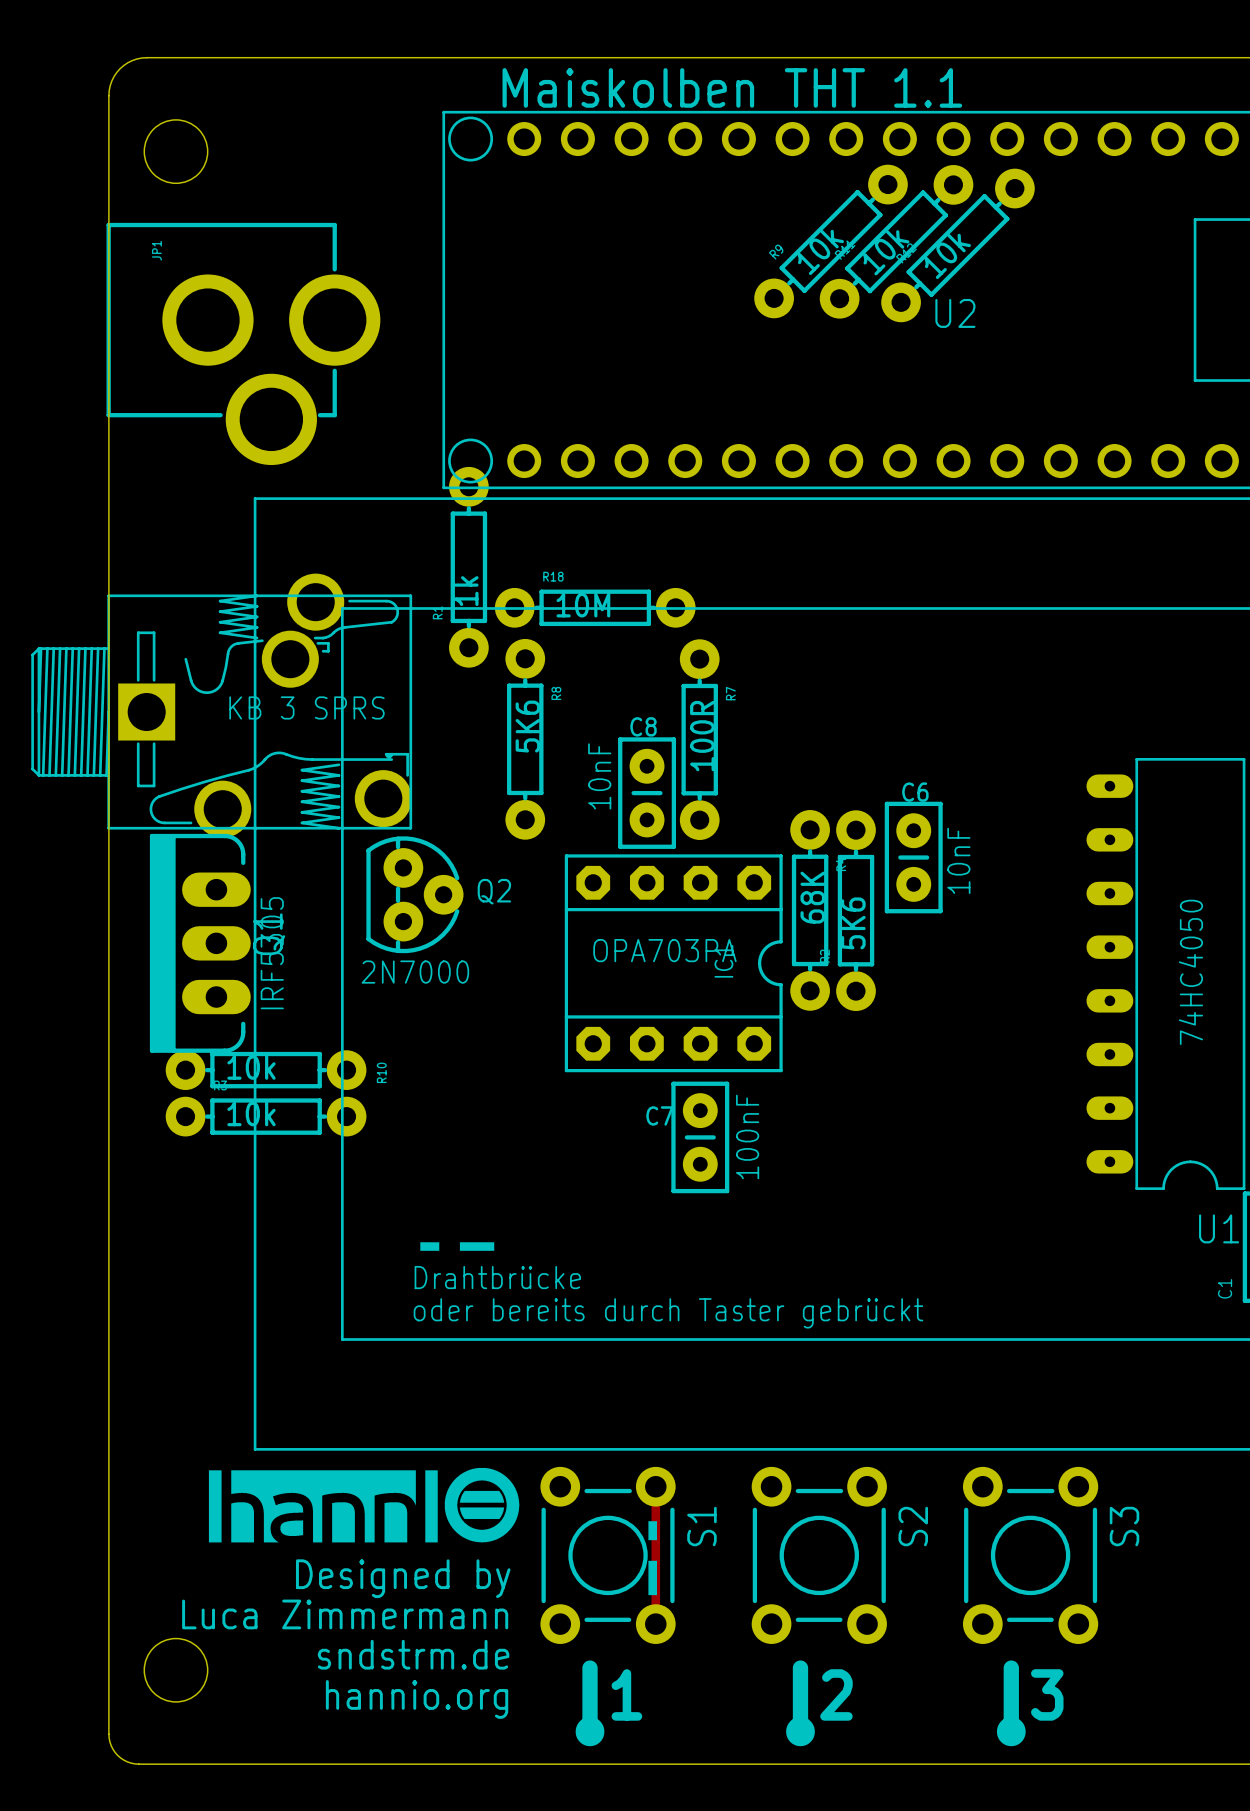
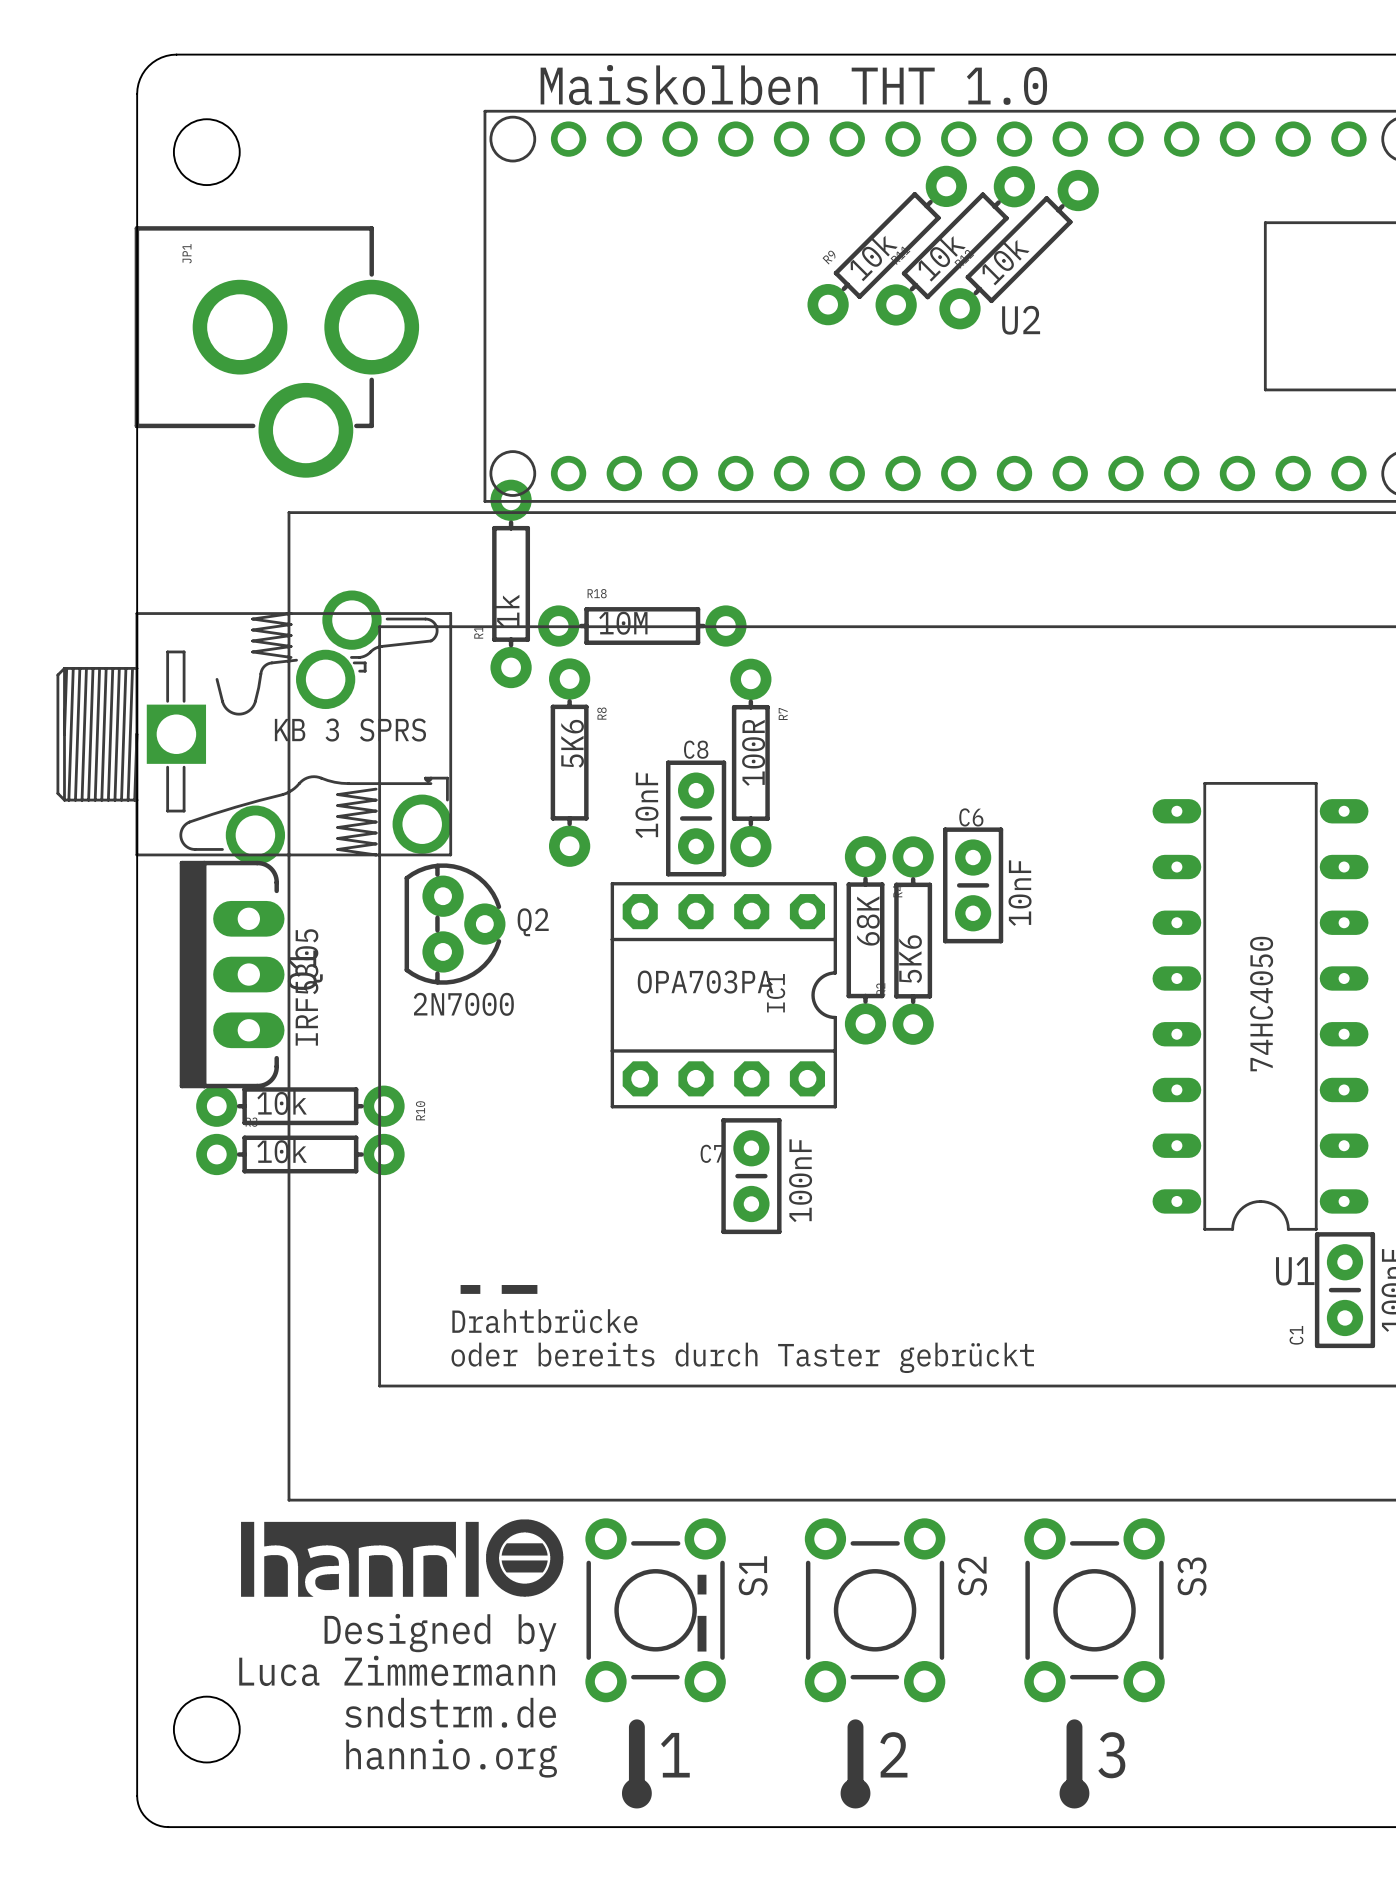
text: Maiskolben THT 1.1 (732, 87) -> Maiskolben THT 1.0 (793, 85)
track: (655, 1486) (655, 1624) -> none

